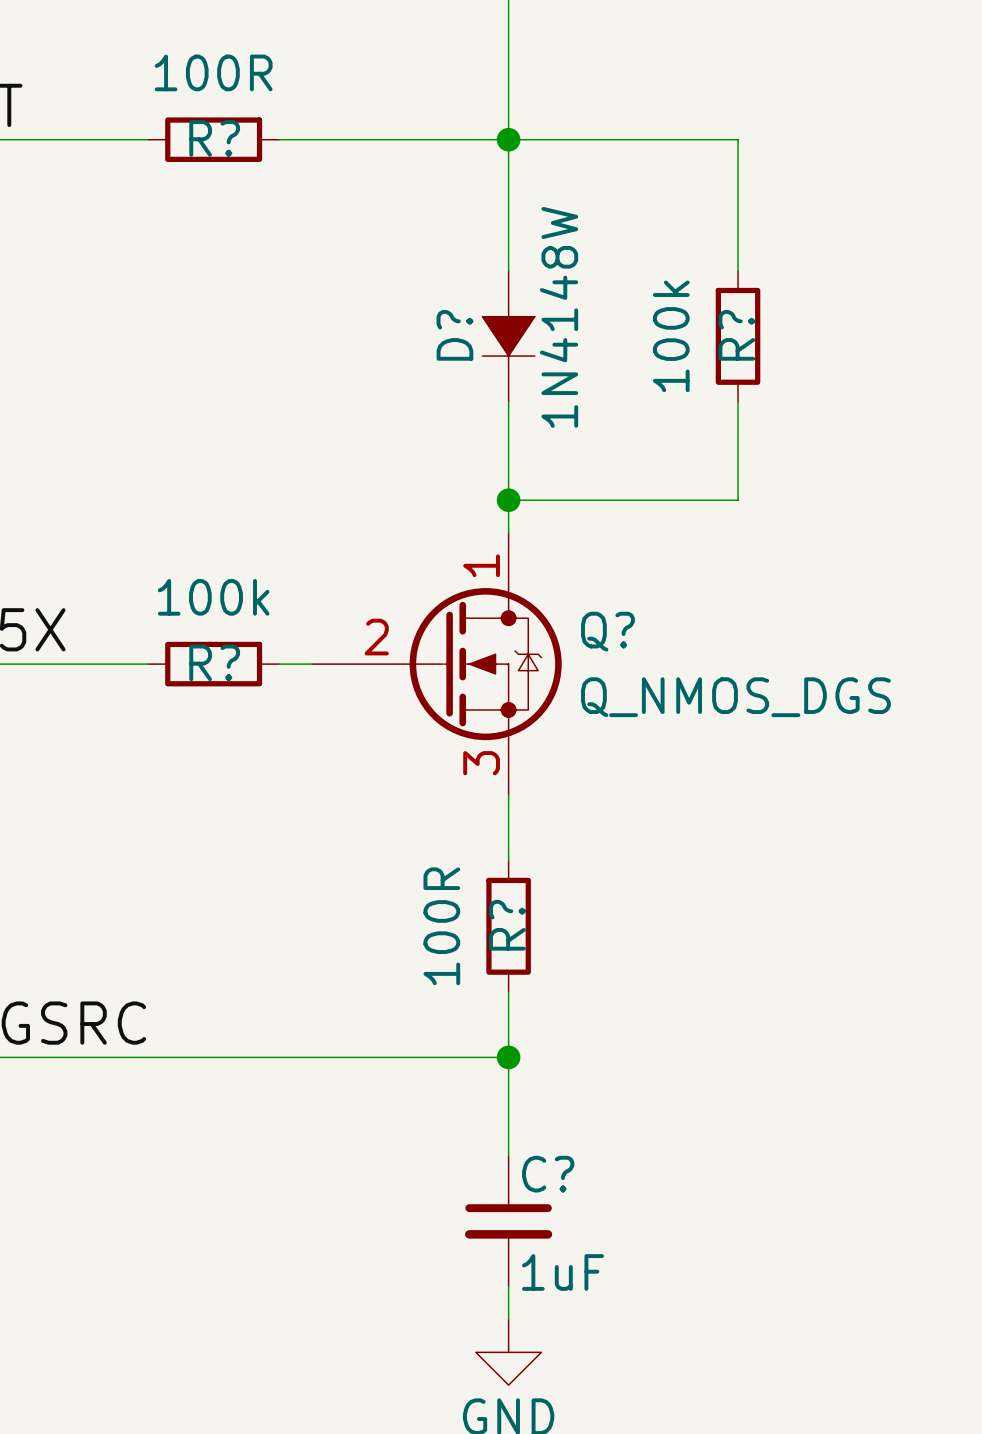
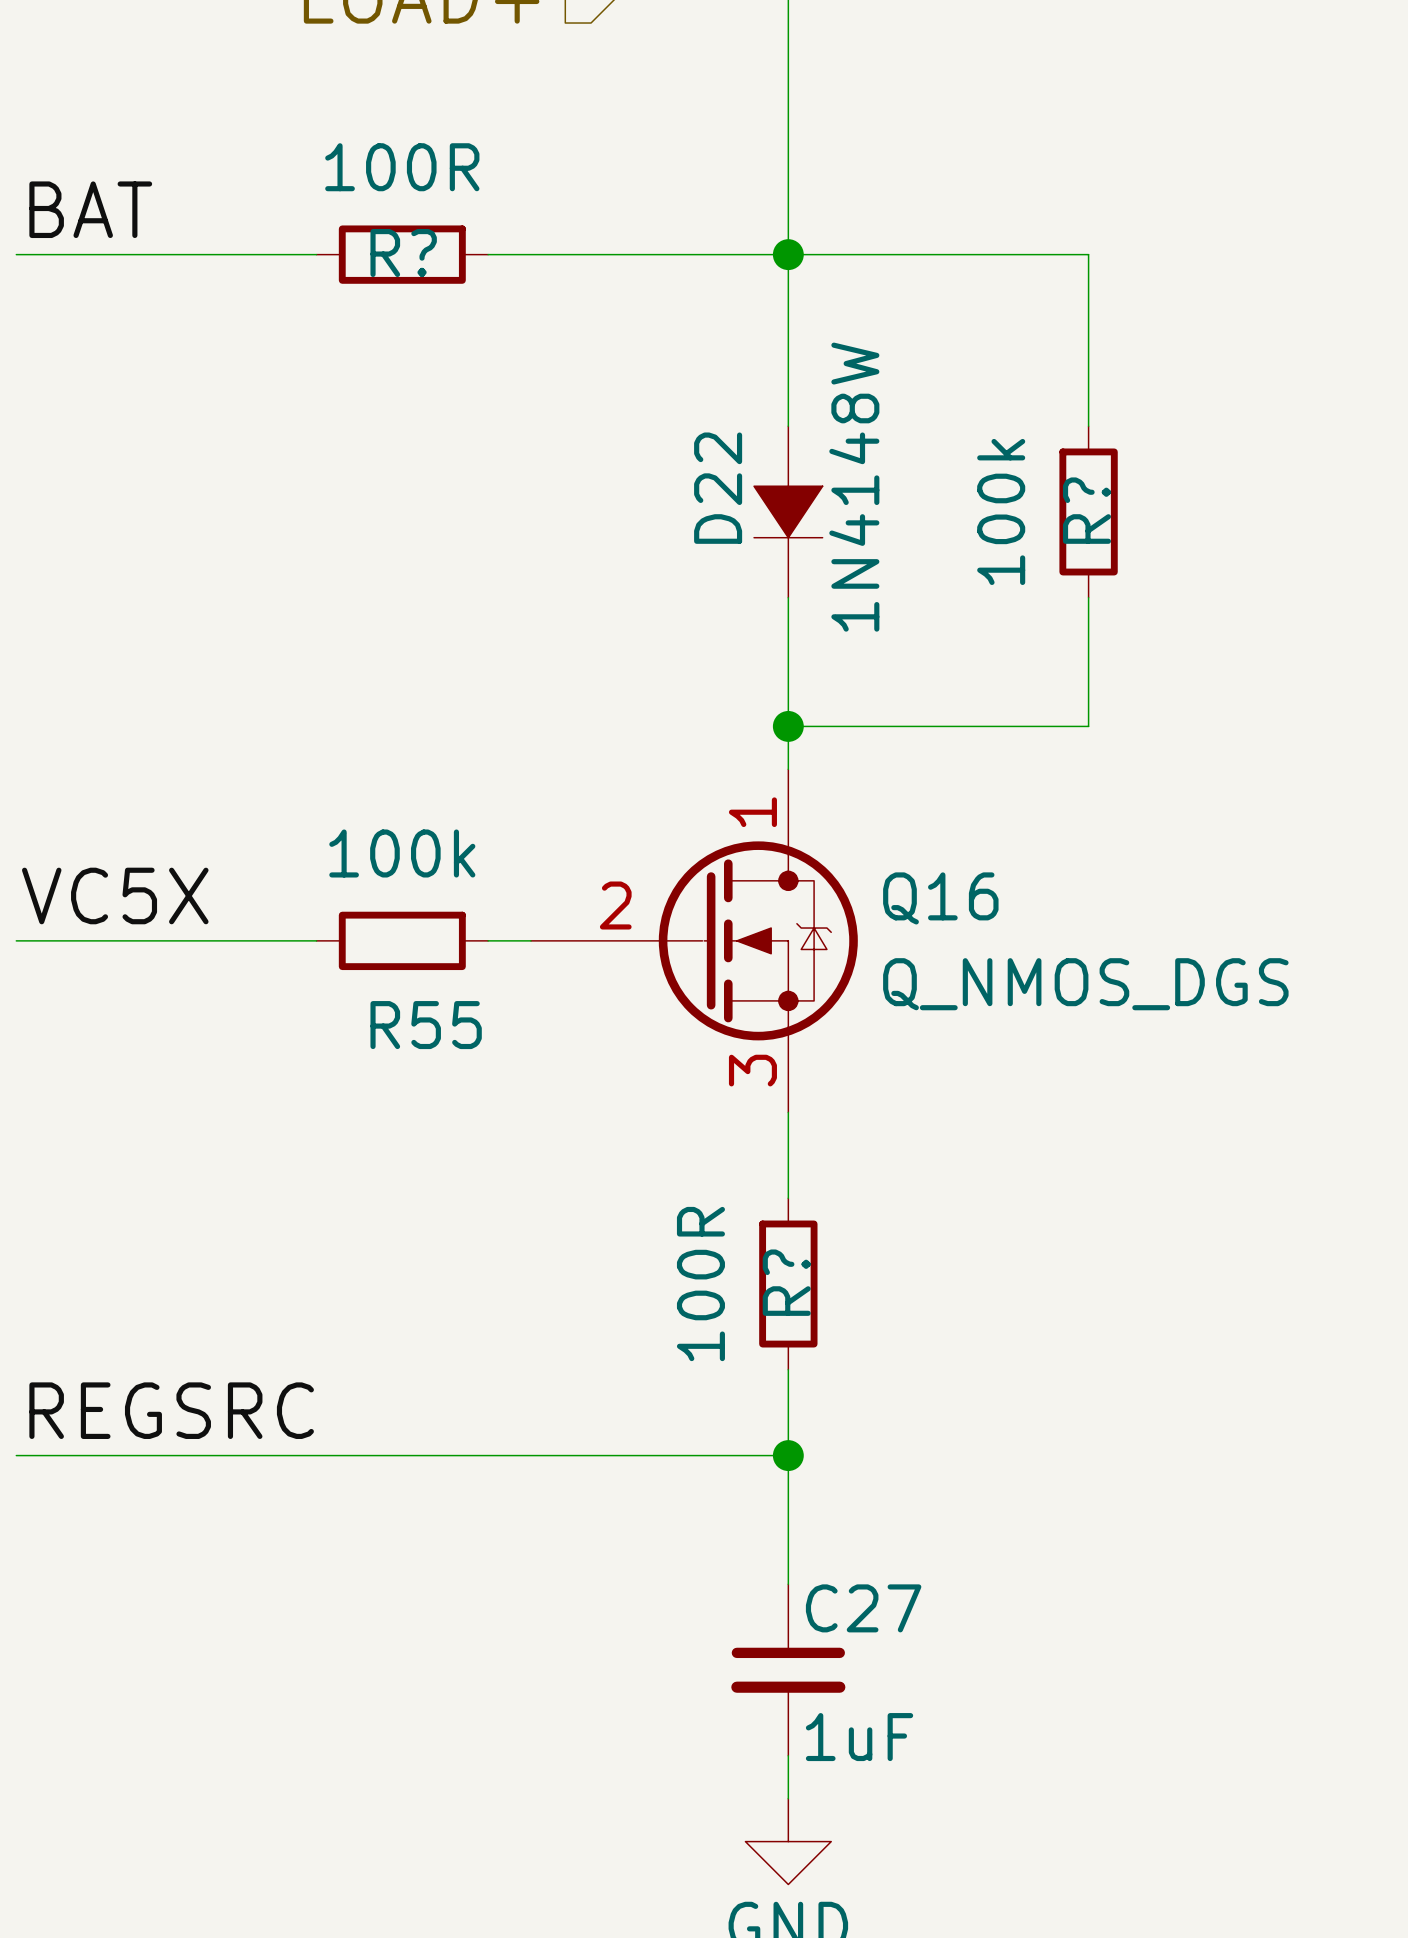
D? name: D? (454, 335) -> D22 (718, 488)
Q? name: Q? (607, 631) -> Q16 (940, 898)
R? name: R? (214, 662) -> R55 (426, 1025)
C? name: C? (548, 1174) -> C27 (863, 1608)

